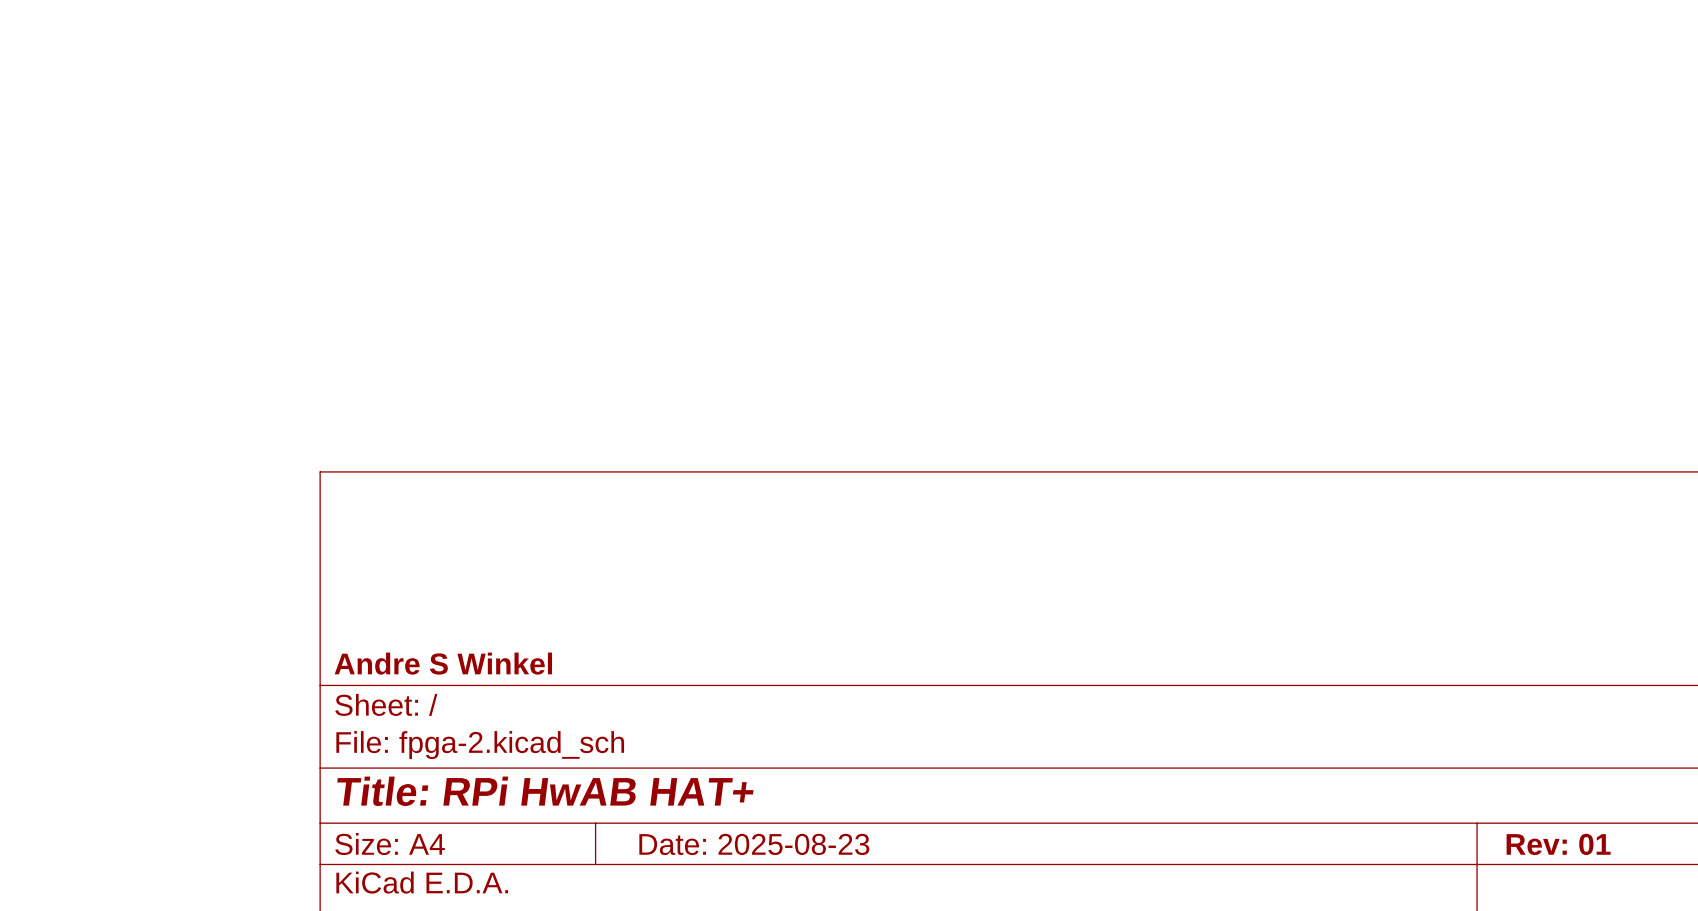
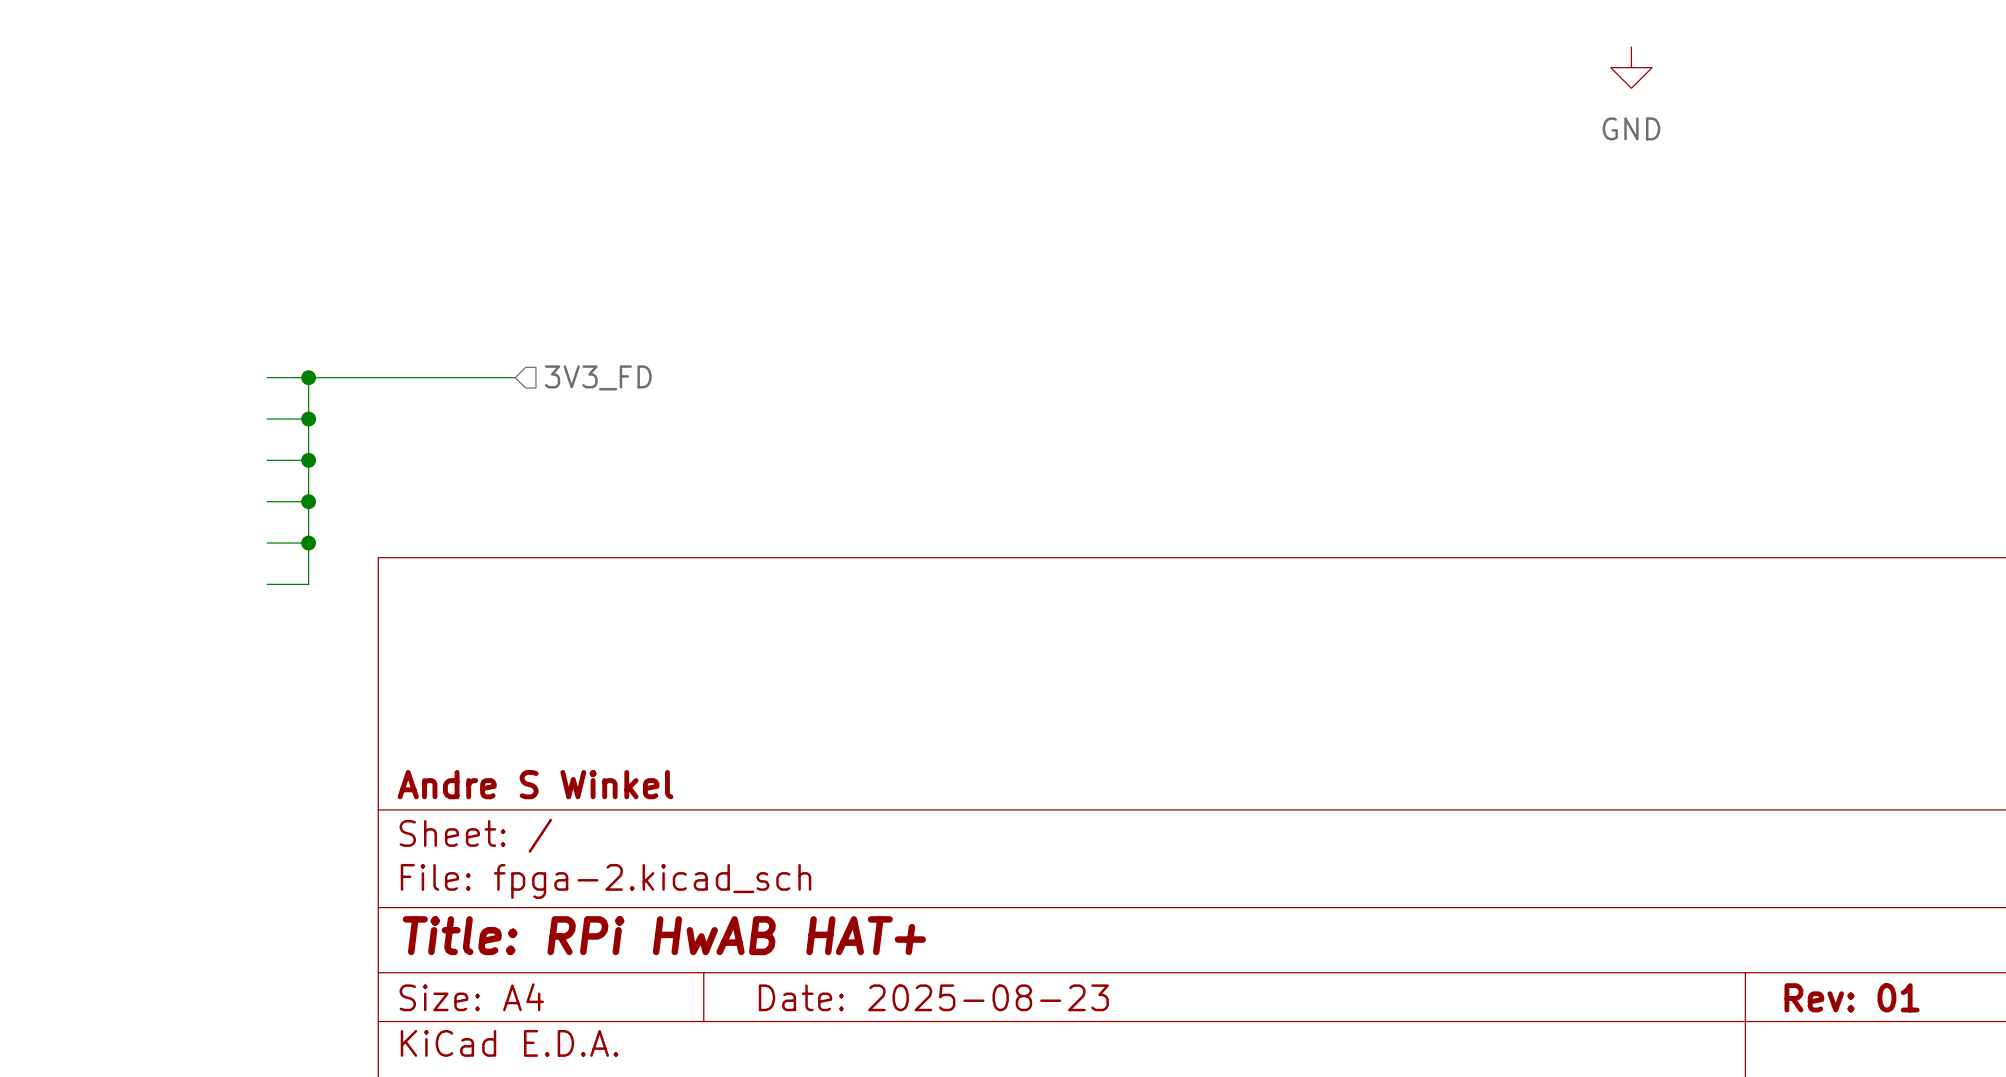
power symbol: none -> GND (1631, 67)
wire: none -> (267, 377) (515, 377)
wire: none -> (308, 377) (308, 584) (267, 584)
junction: none -> (308, 377)
hierarchical label: none -> 3V3_FD (598, 377)
wire: none -> (267, 419) (308, 419)
junction: none -> (308, 419)
wire: none -> (267, 460) (308, 460)
junction: none -> (308, 460)
wire: none -> (267, 501) (308, 501)
junction: none -> (308, 501)
wire: none -> (267, 543) (308, 543)
junction: none -> (308, 543)

